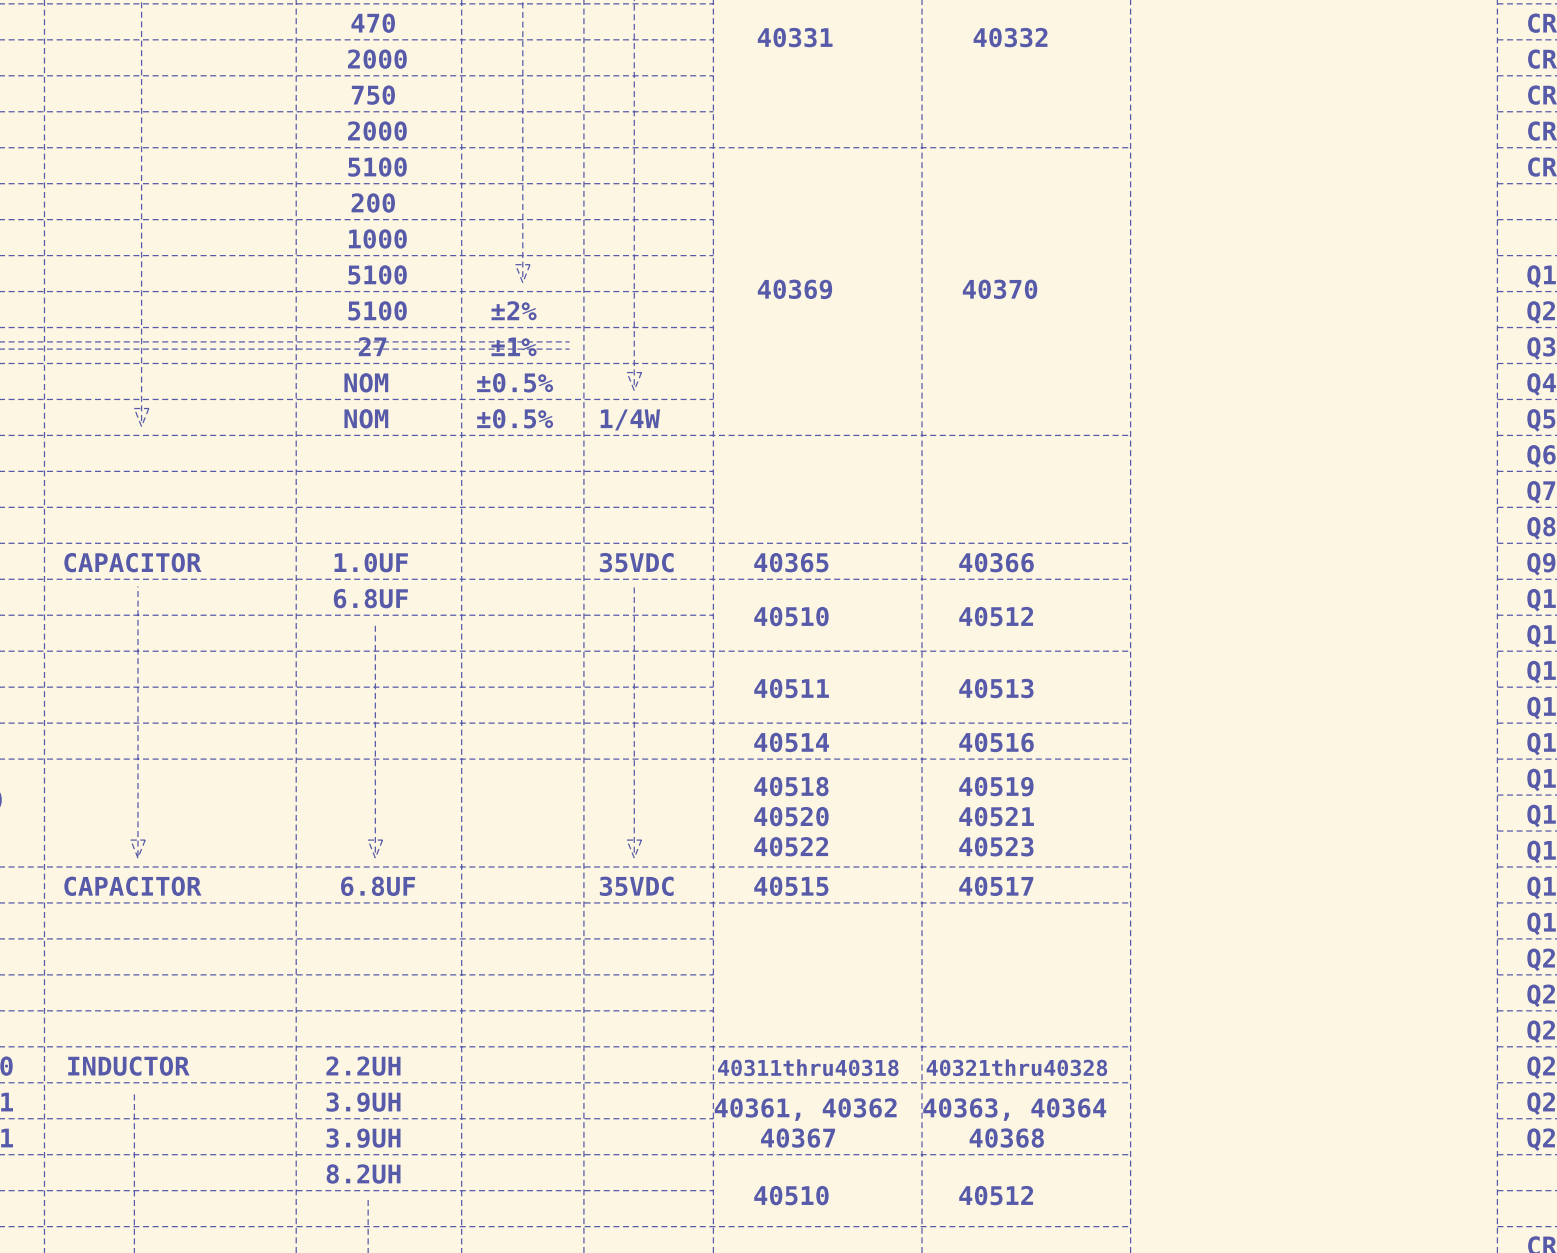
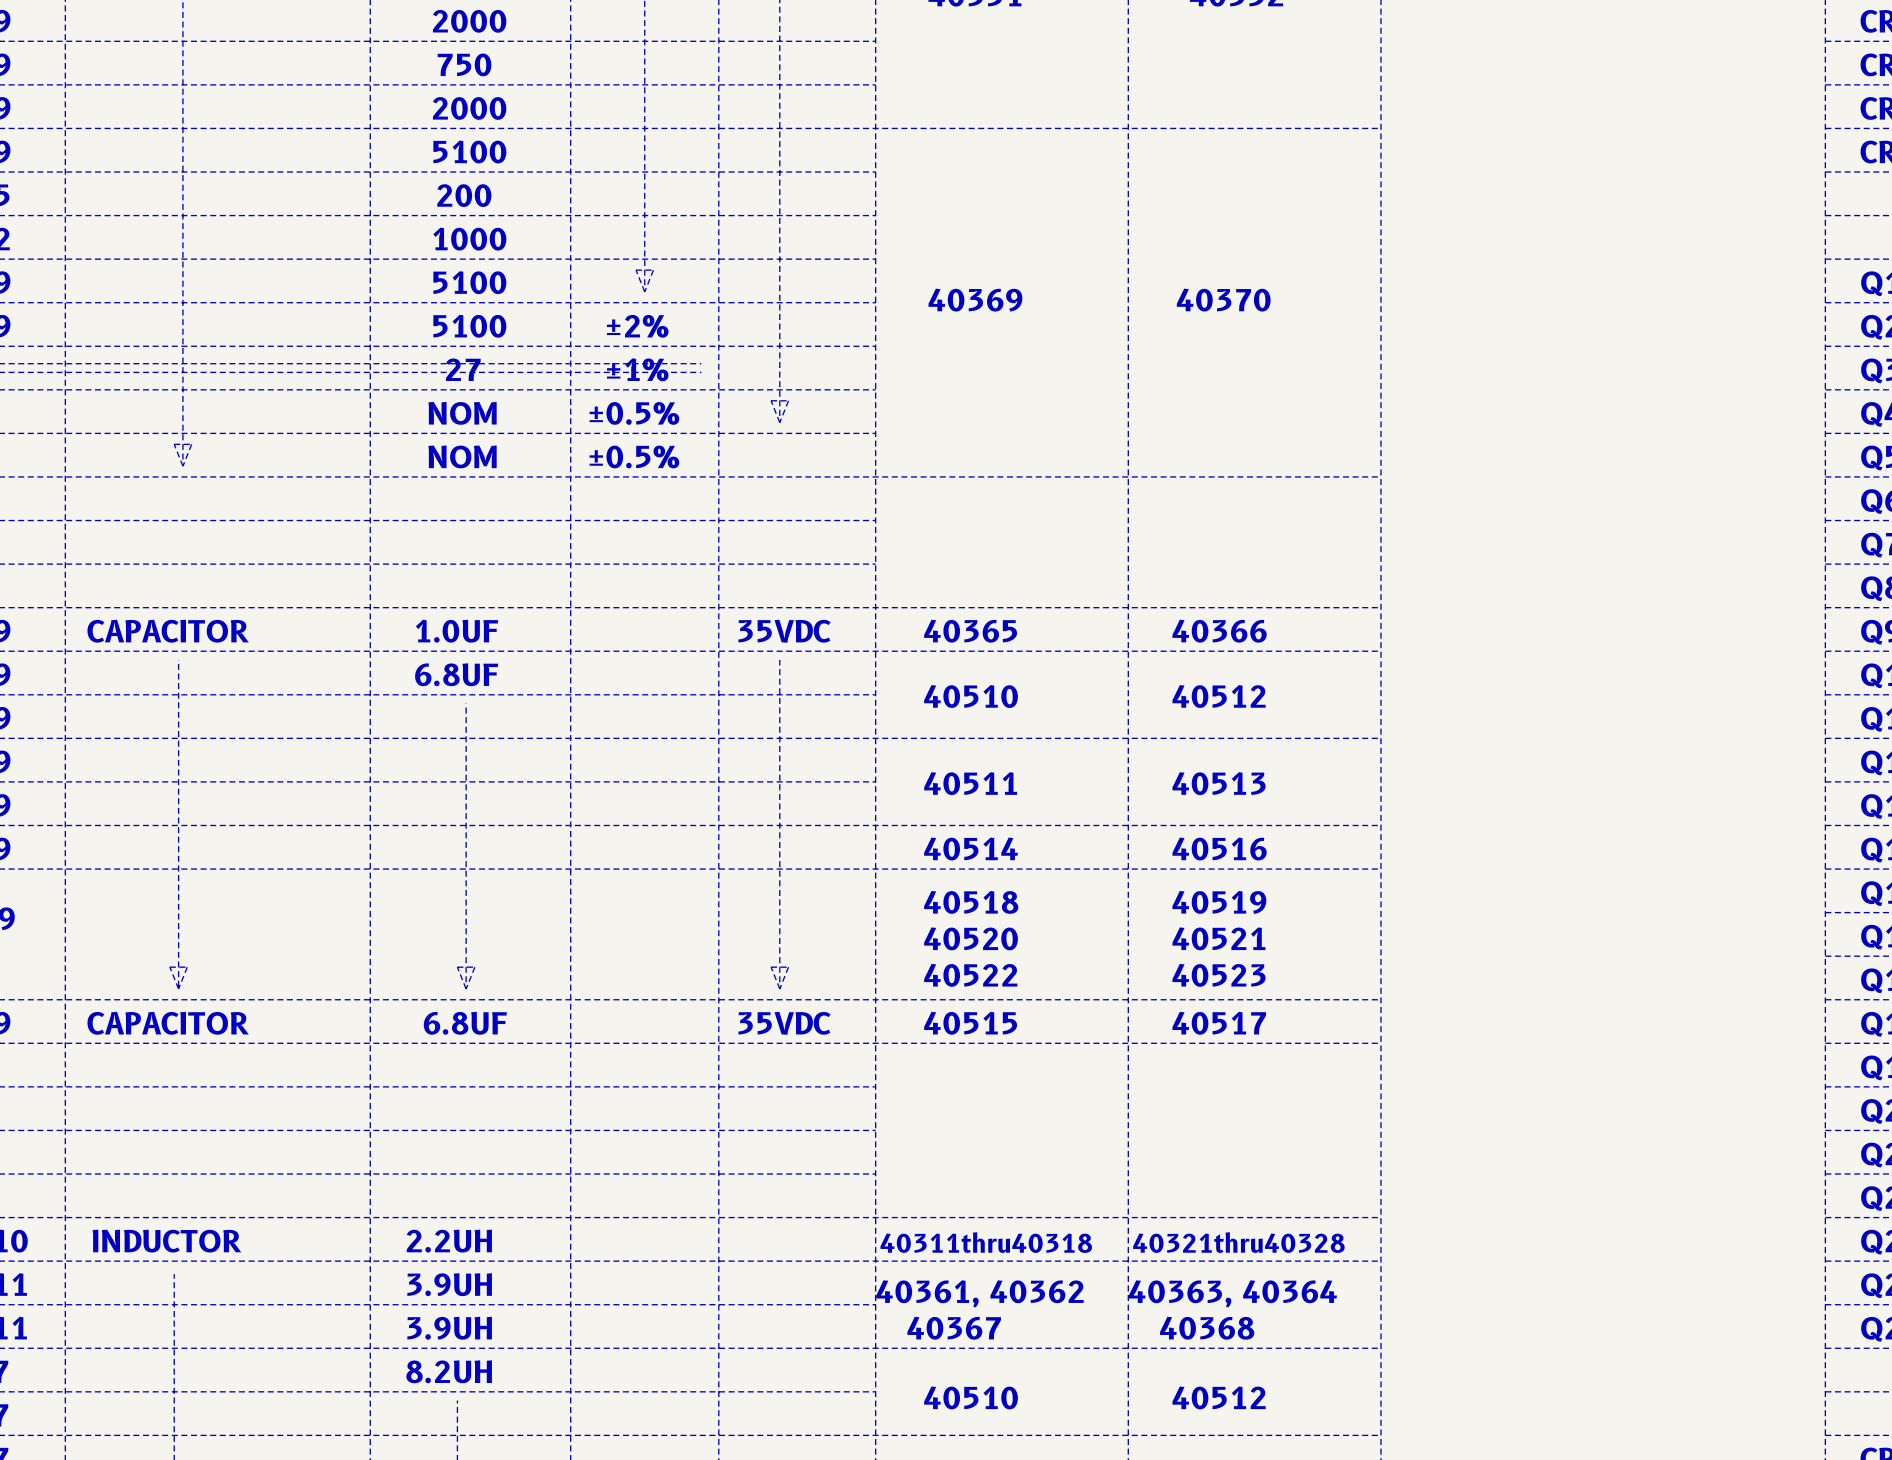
text: 1/4W (630, 419) -> none

